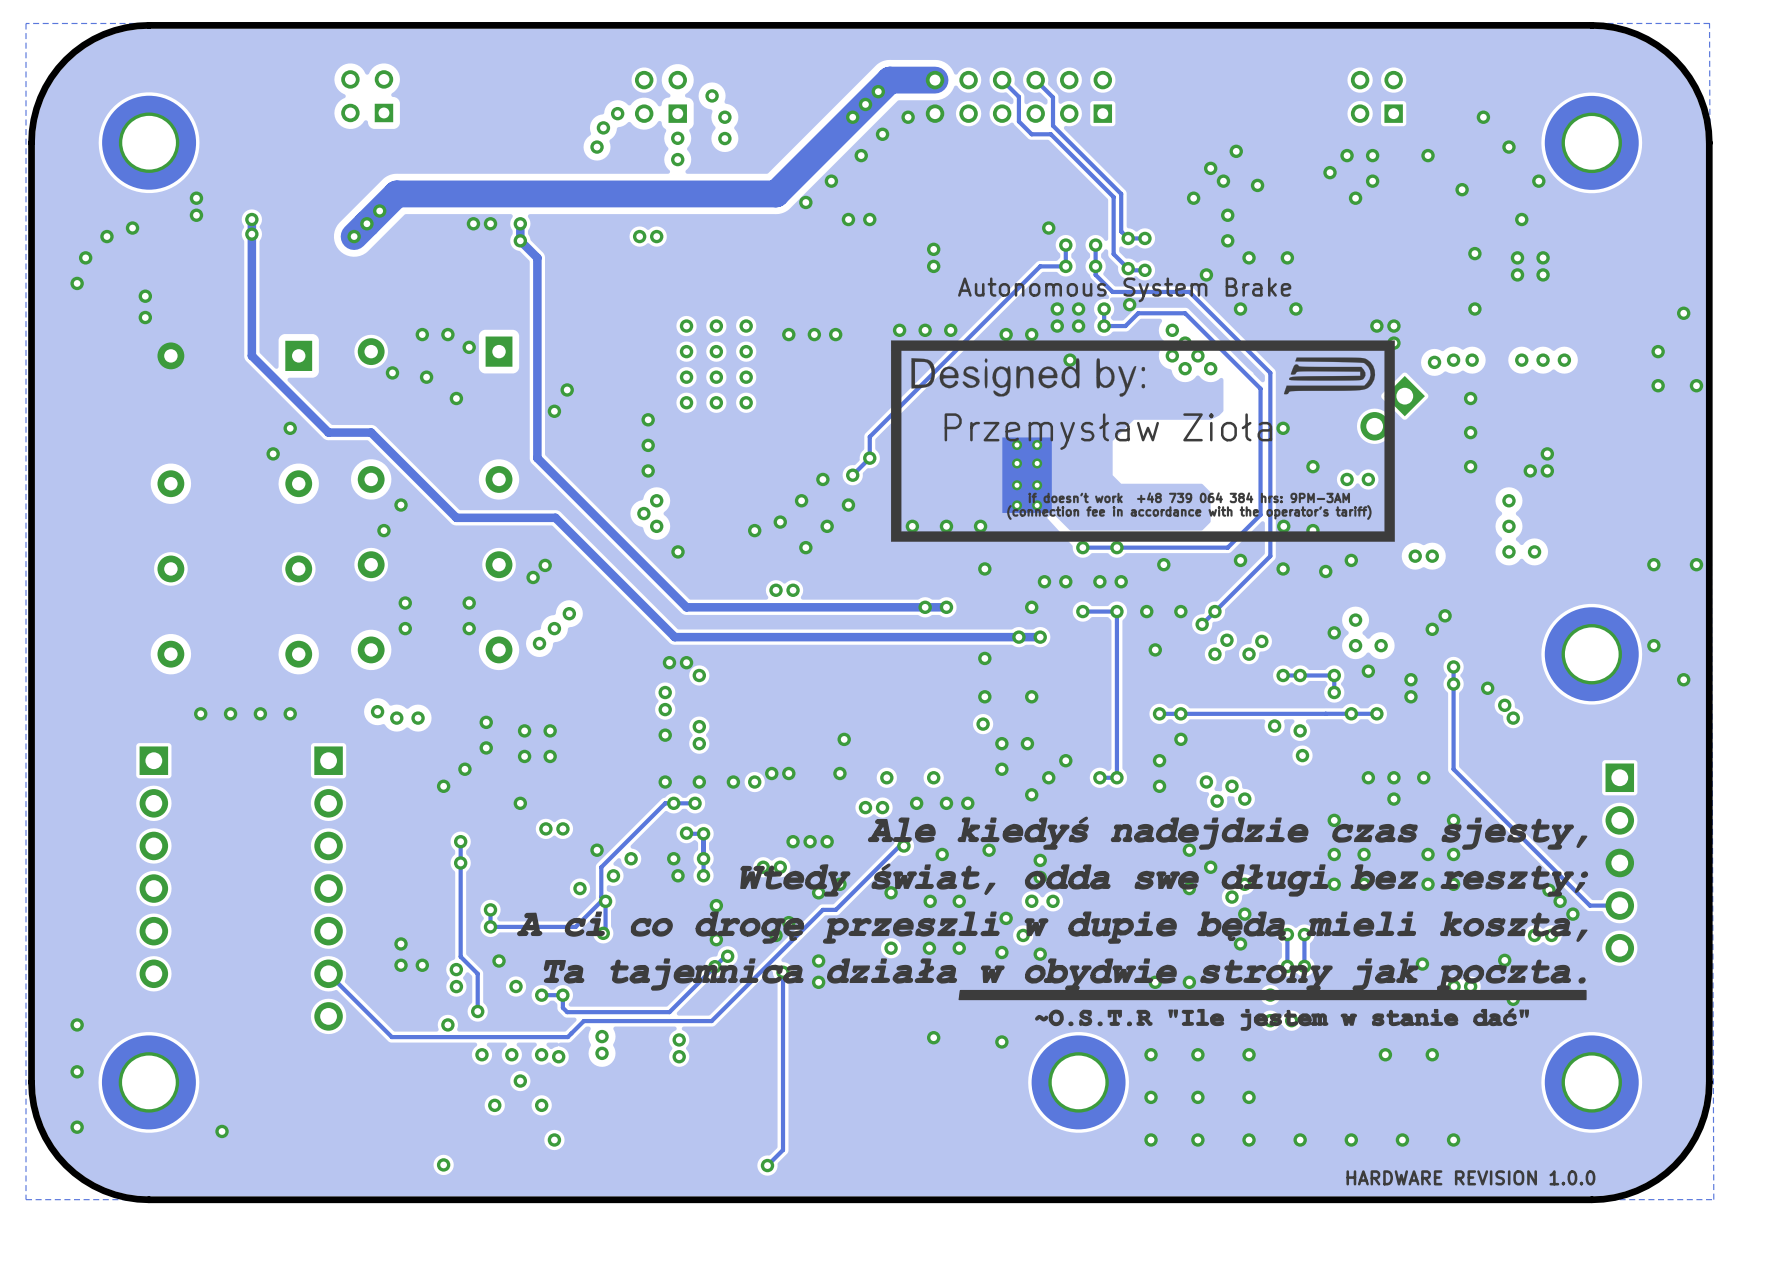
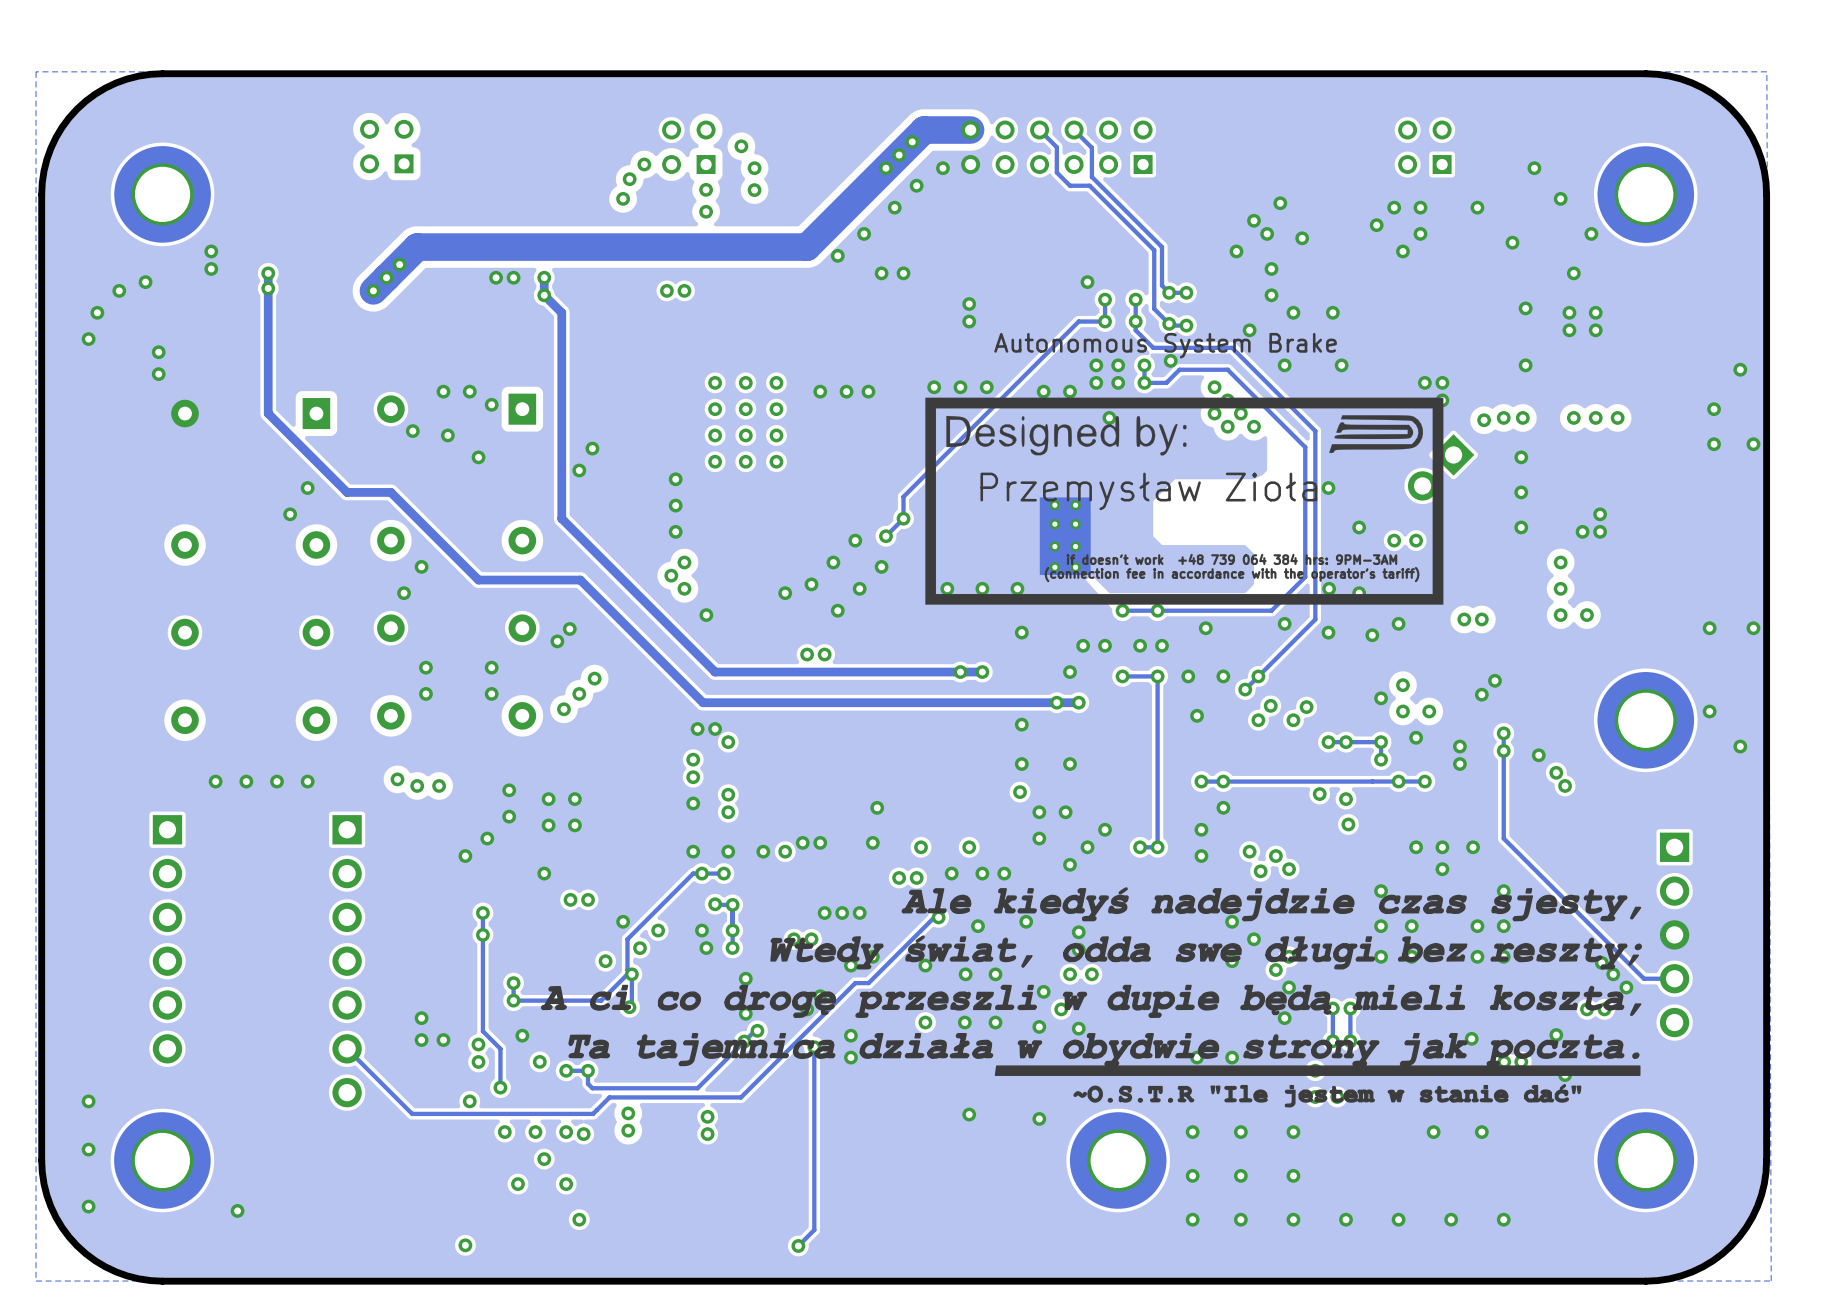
text: HARDWARE REVISION 1.0.0 (1470, 1177) -> none

